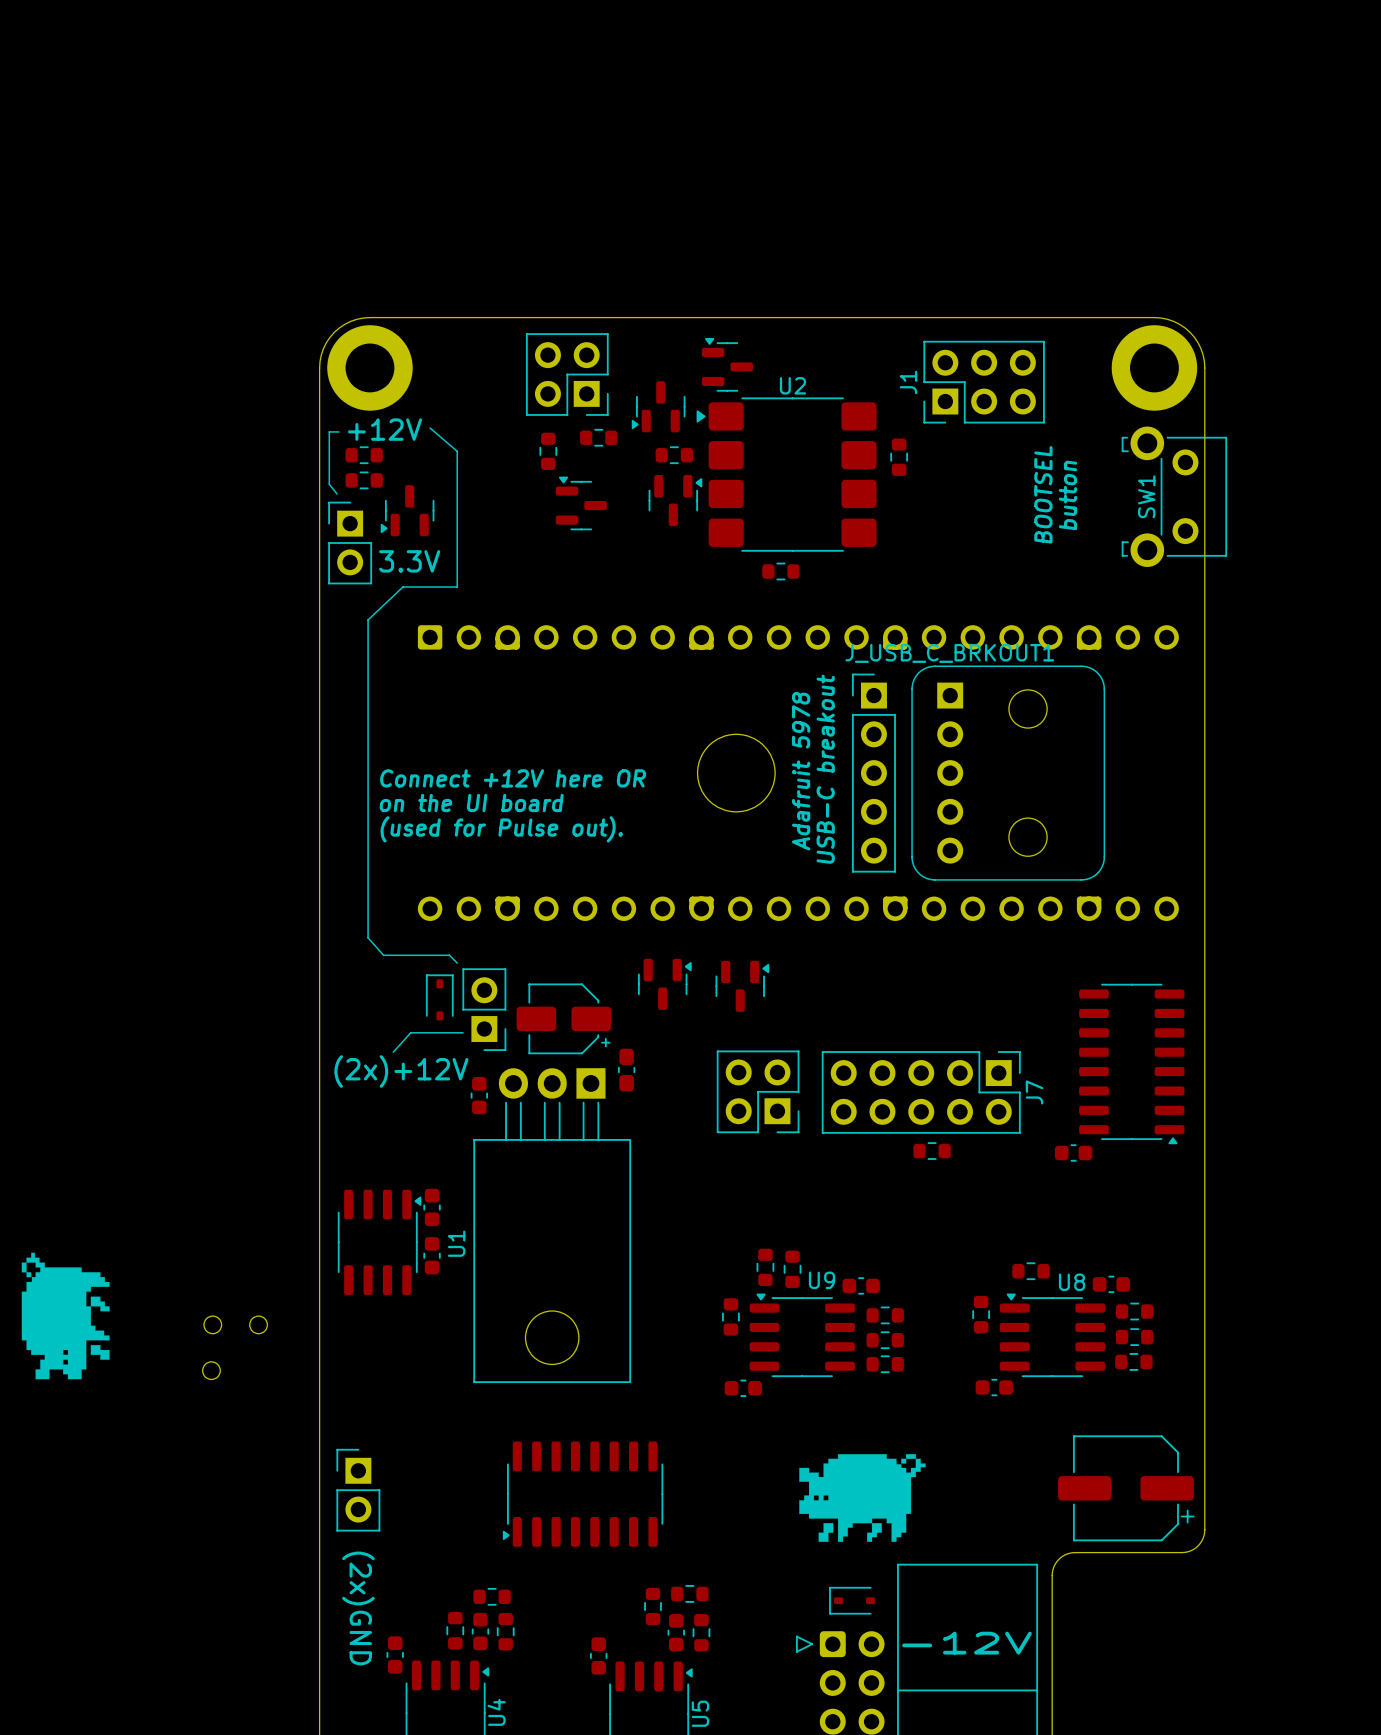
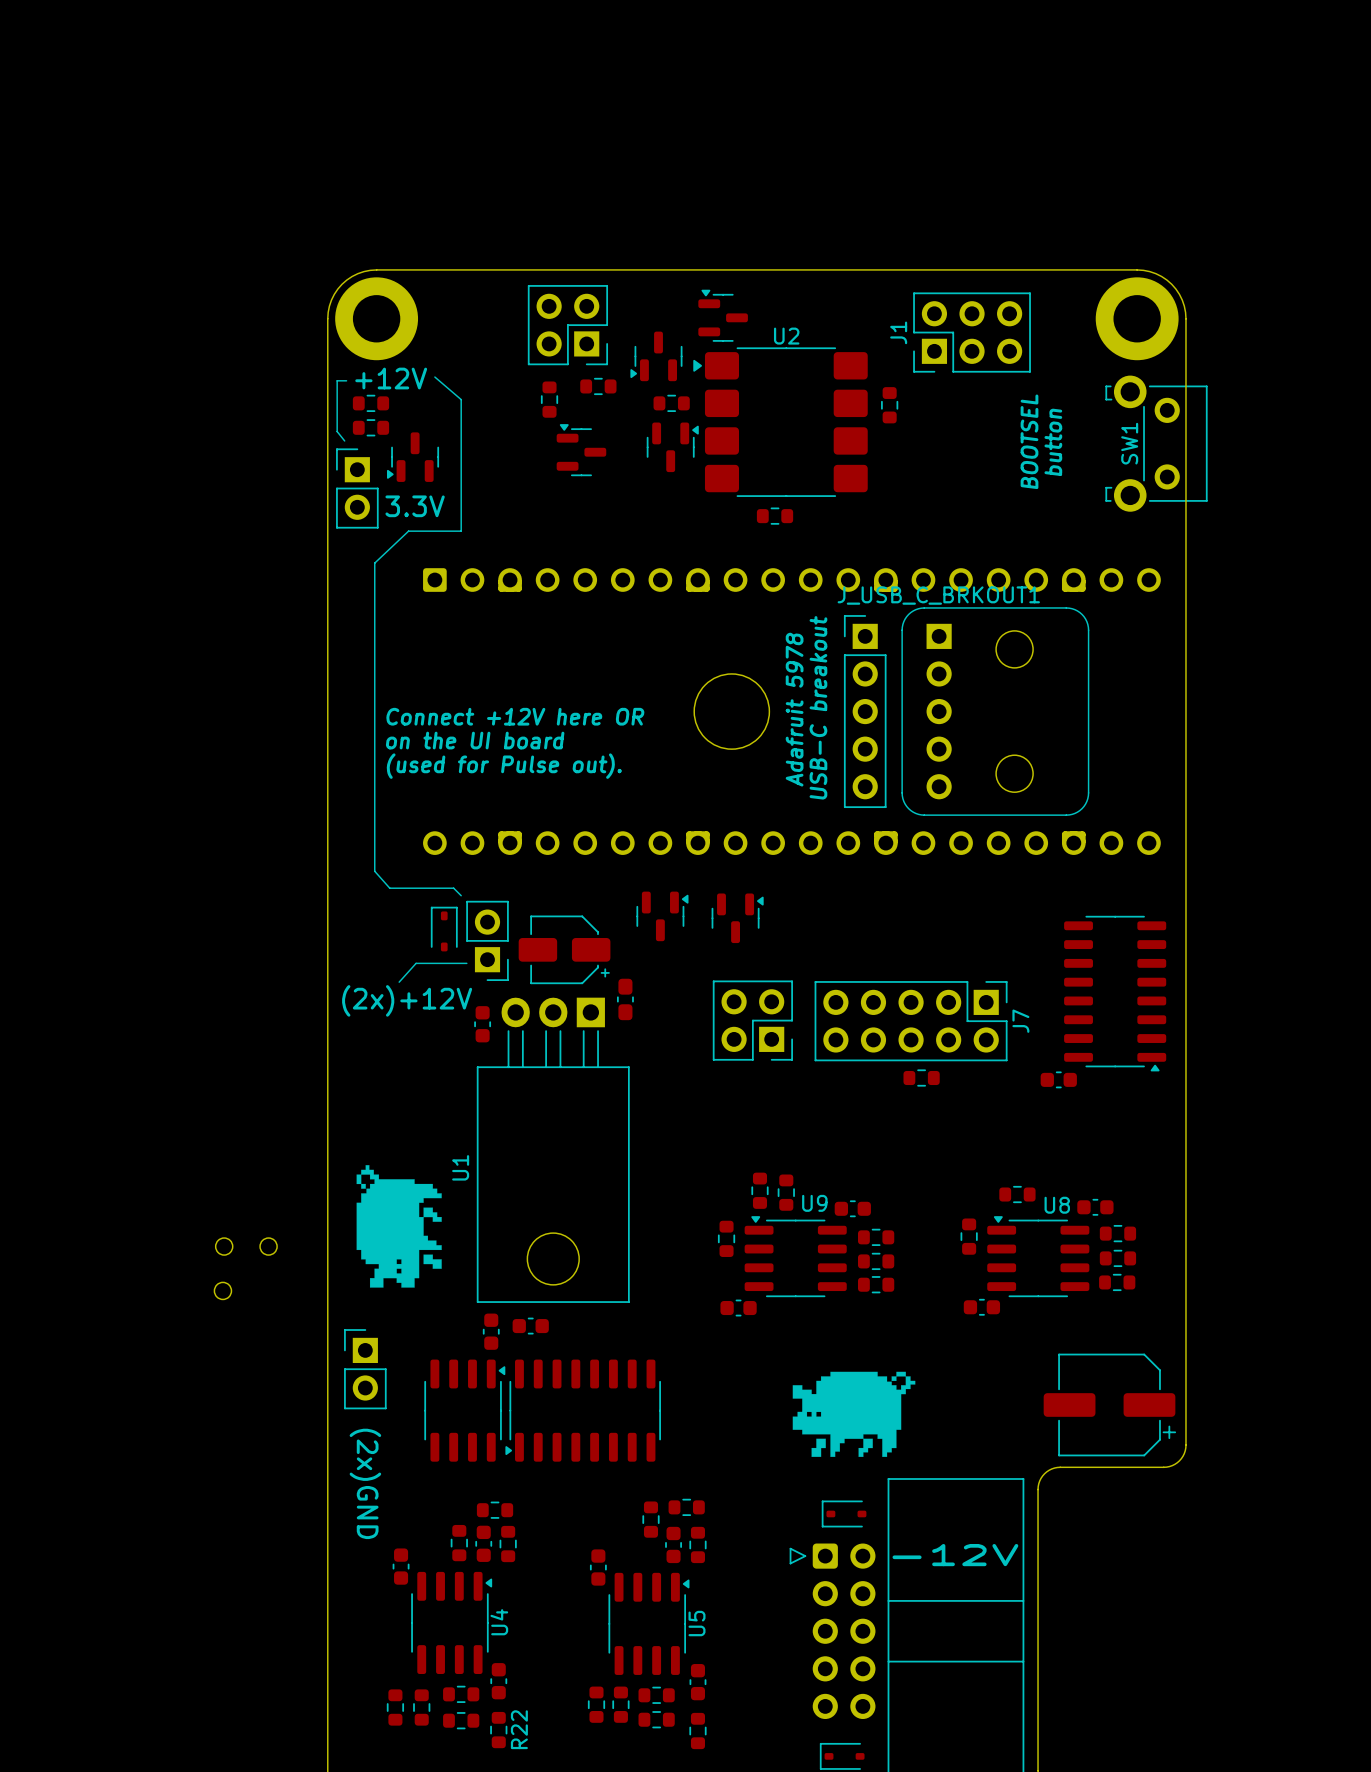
part: (432, 1207) -> none
part position: (379, 1242) -> (464, 1410)
part: (432, 1255) -> none
drawing position: (65, 1315) -> (399, 1226)
part: none -> (530, 1326)
part: none -> (491, 1331)
part position: (358, 1490) -> (365, 1369)
text position: (2x)GND (358, 1608) -> (2x)GND (365, 1483)

